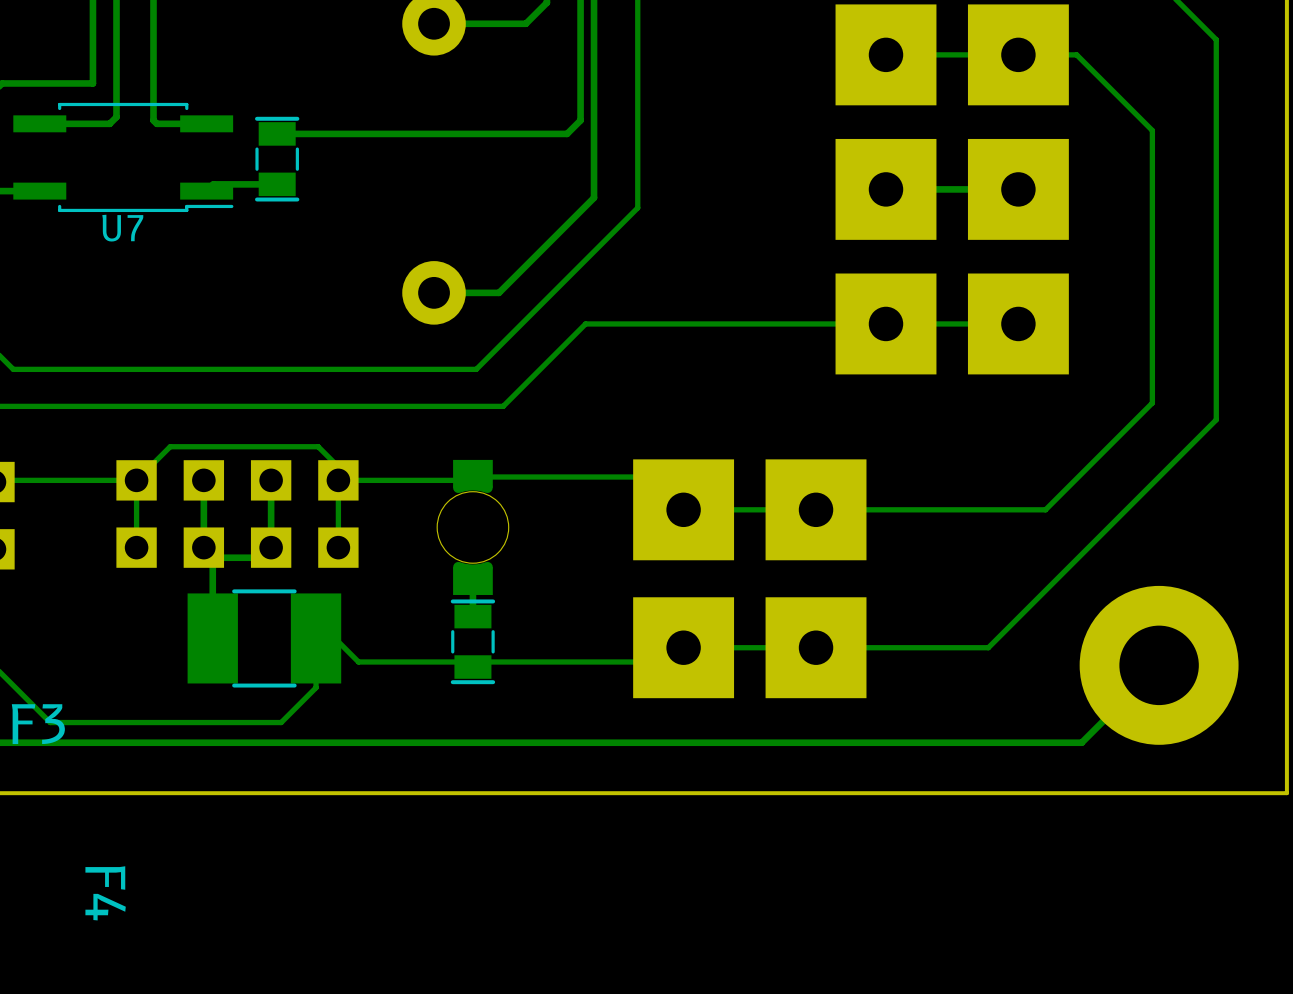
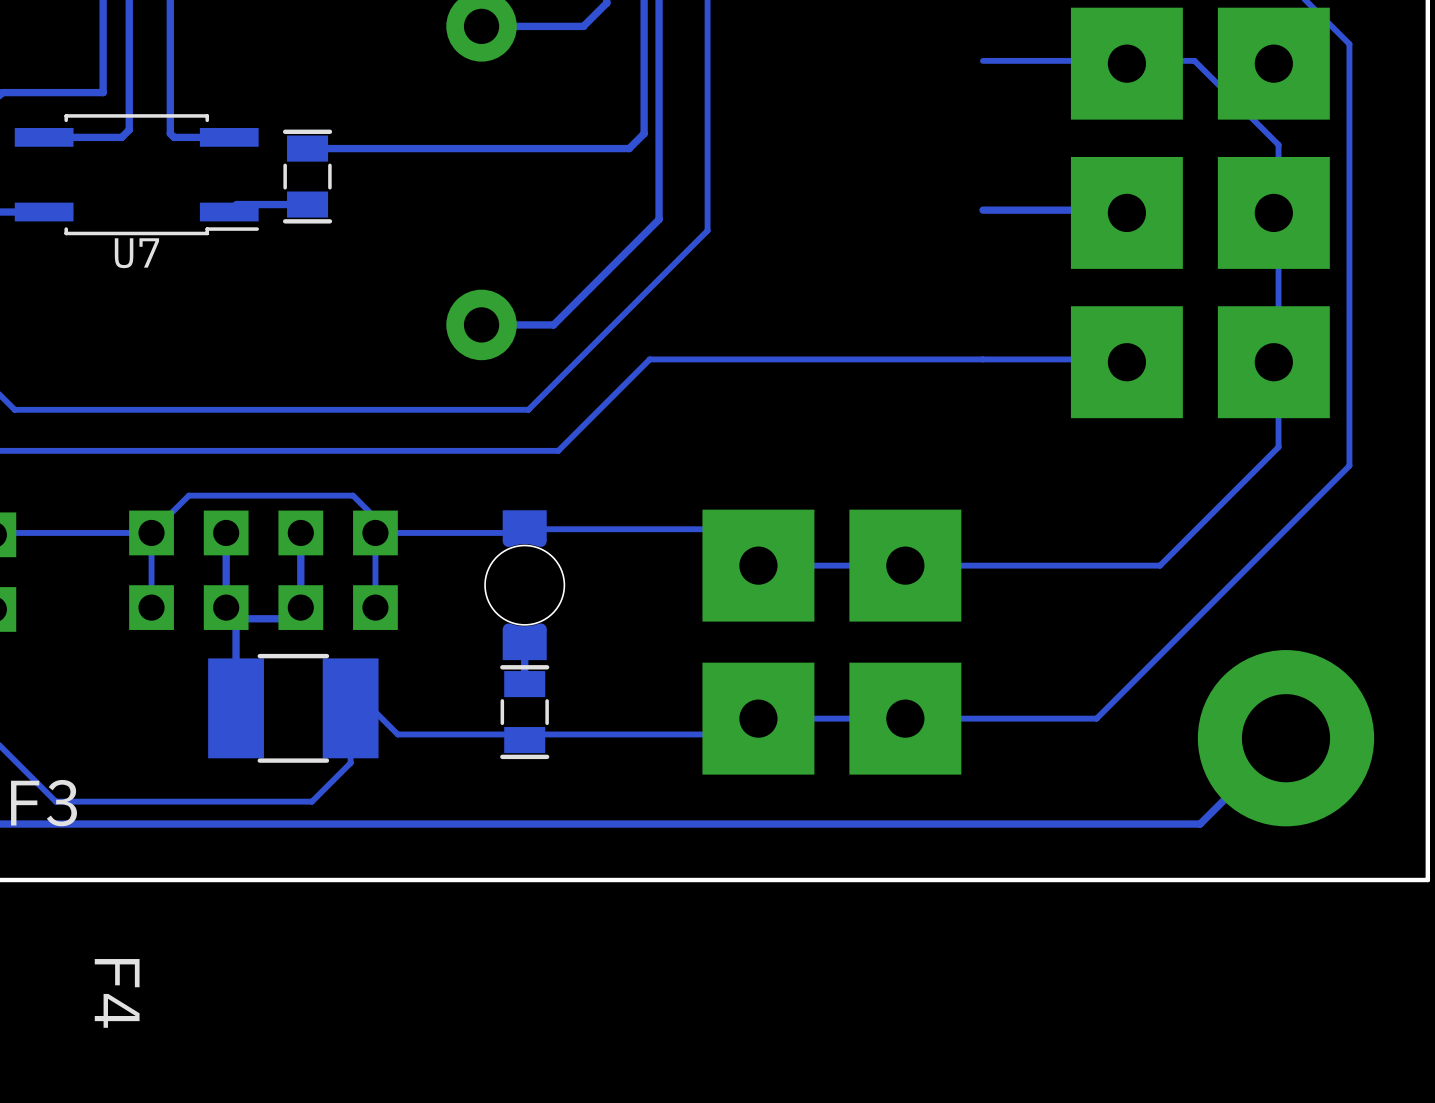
part: (952, 54) -> none
part: none -> (1200, 63)
part: (952, 189) -> none
part: none -> (1200, 212)
part: (952, 323) -> none
part: none -> (1200, 362)

